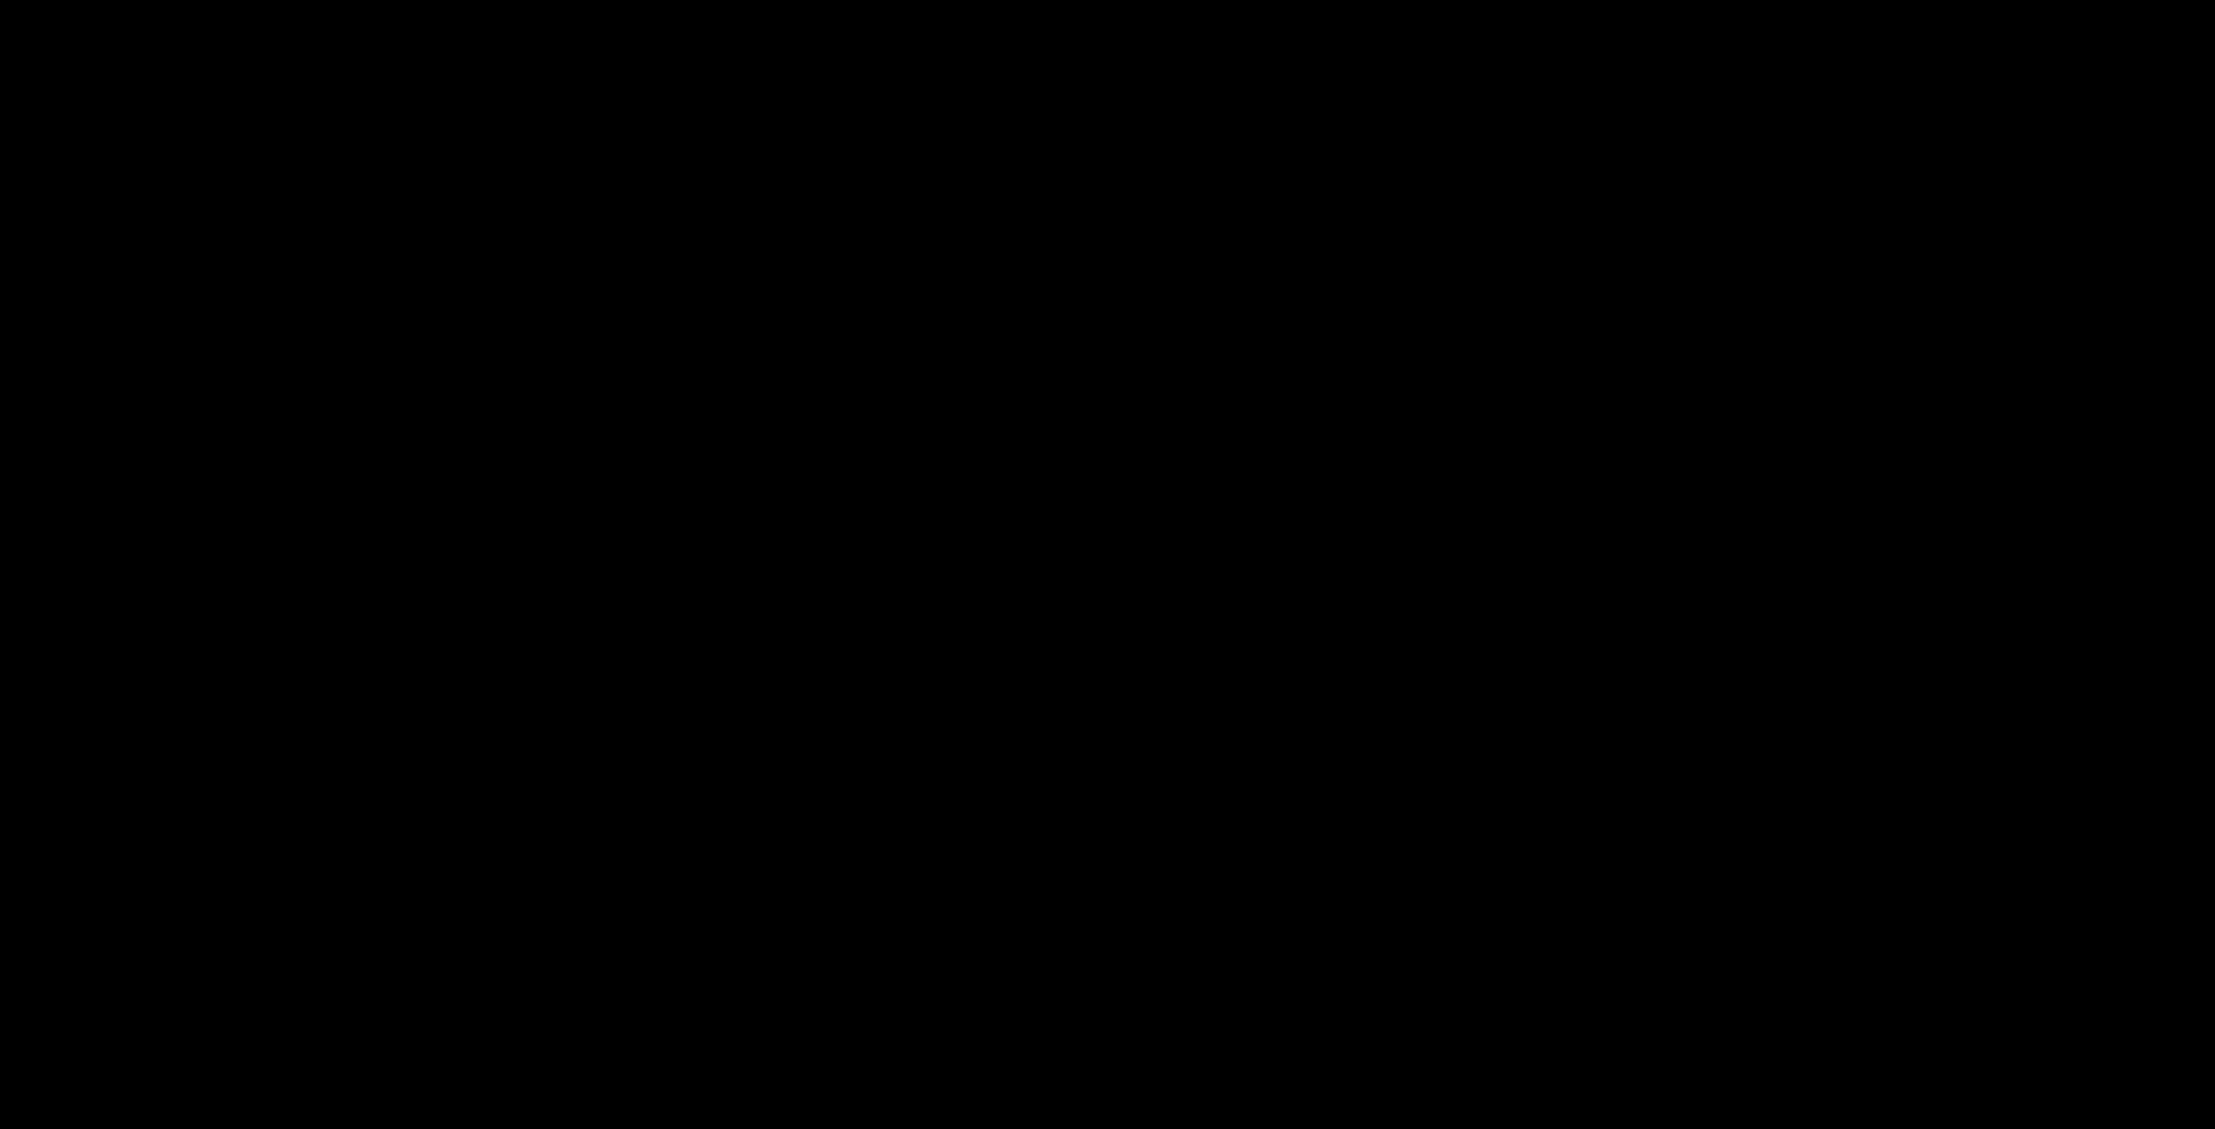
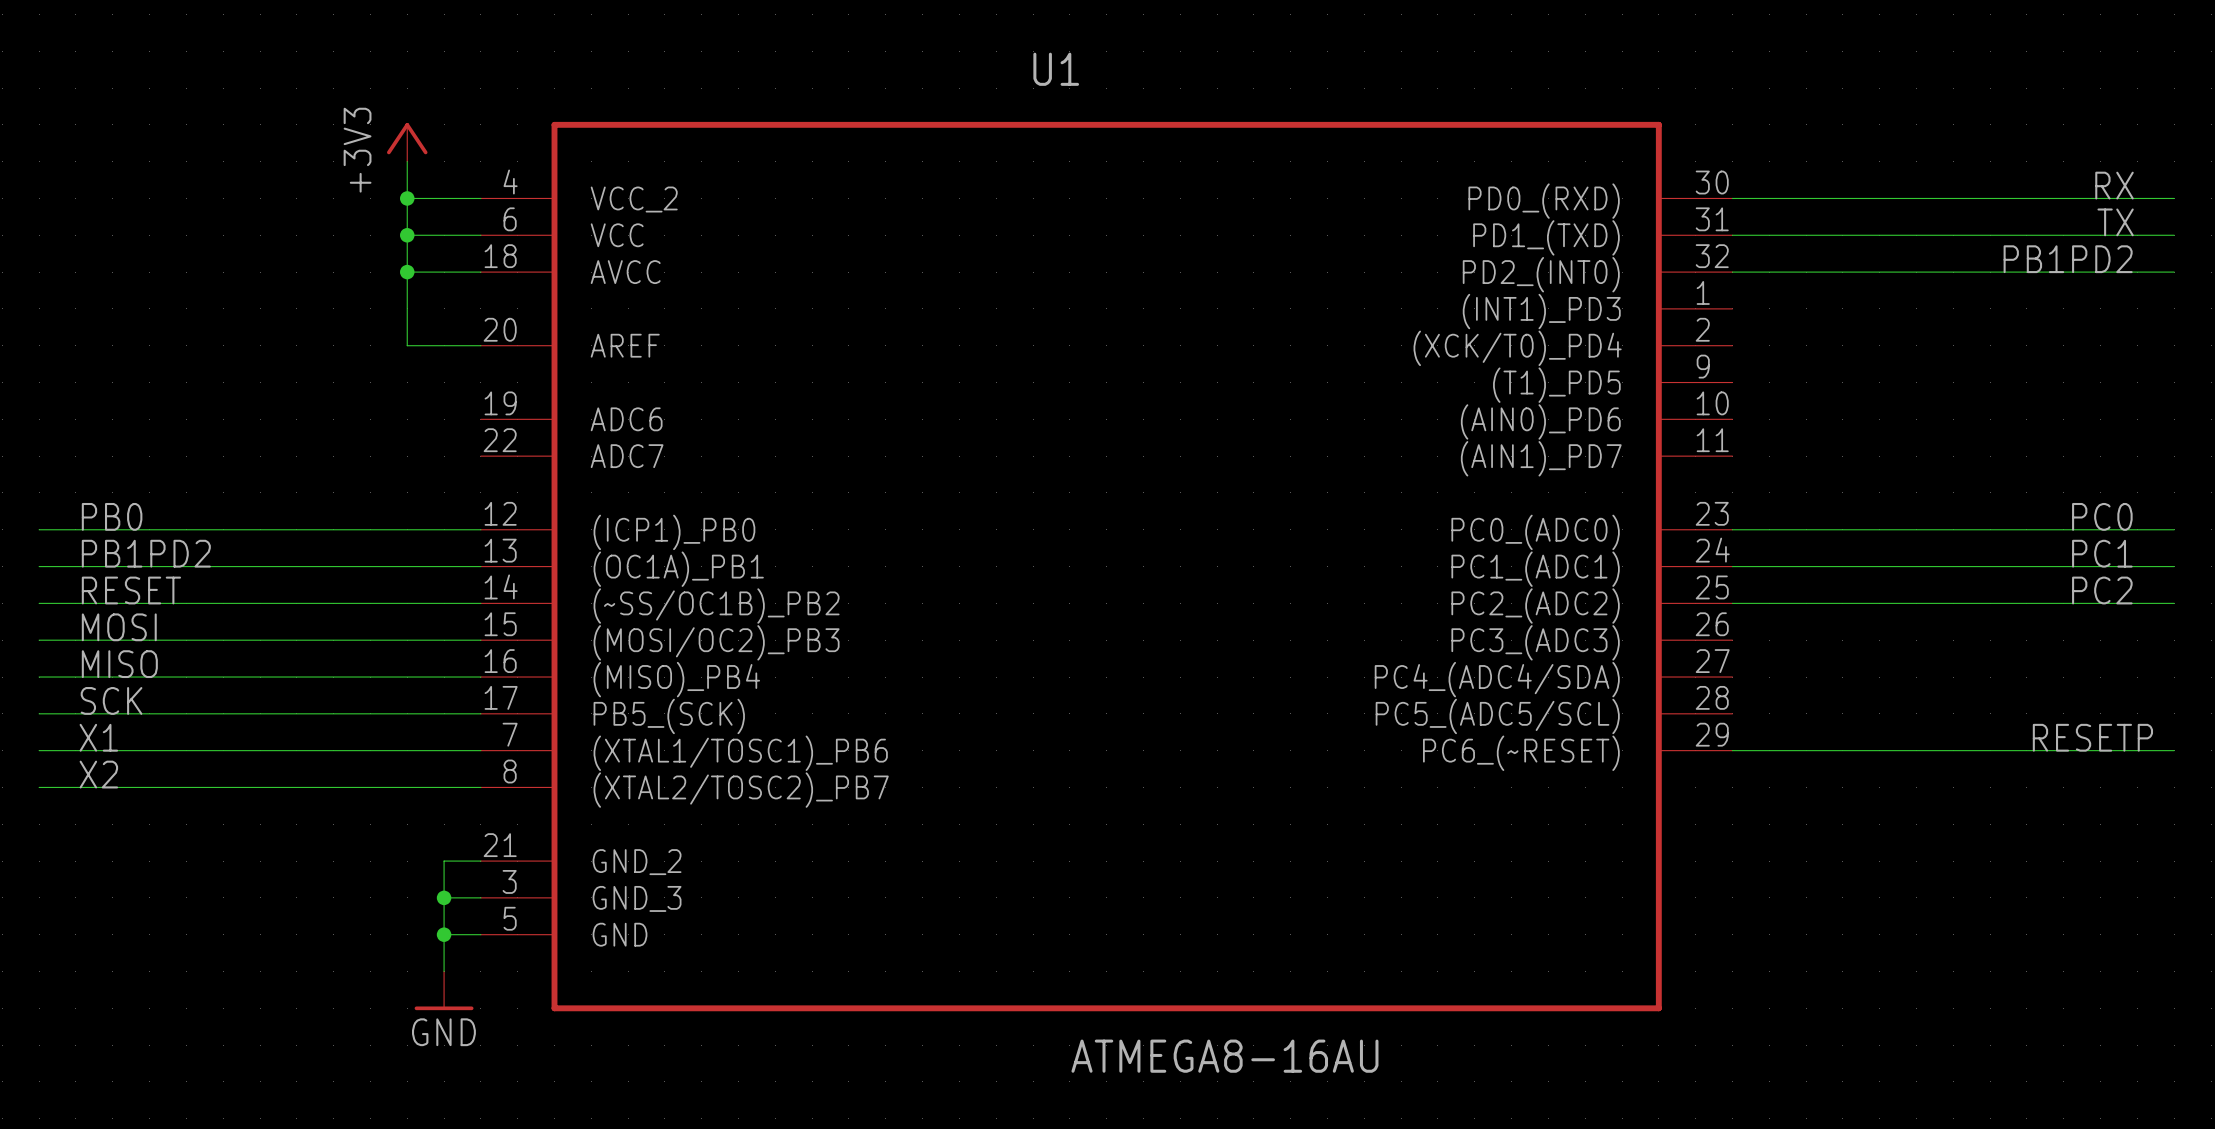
power symbol: none -> +3V3 (407, 142)
wire: none -> (407, 161) (407, 345) (480, 345)
label: none -> RX (2114, 185)
wire: none -> (407, 198) (480, 198)
junction: none -> (407, 198)
wire: none -> (1732, 198) (2174, 198)
label: none -> TX (2115, 222)
wire: none -> (407, 235) (480, 235)
junction: none -> (407, 235)
wire: none -> (1732, 235) (2174, 235)
label: none -> PB1PD2 (2068, 259)
wire: none -> (407, 272) (480, 272)
junction: none -> (407, 272)
wire: none -> (1732, 272) (2174, 272)
label: none -> PB0 (112, 516)
label: none -> PC0 (2102, 516)
wire: none -> (39, 529) (480, 529)
wire: none -> (1732, 529) (2174, 529)
label: none -> PB1PD2 (146, 553)
label: none -> PC1 (2102, 553)
wire: none -> (39, 566) (480, 566)
U1: none -> ATMEGA8-16AU (1106, 566)
wire: none -> (1732, 566) (2174, 566)
label: none -> RESET (131, 590)
label: none -> PC2 (2102, 590)
wire: none -> (39, 603) (480, 603)
wire: none -> (1732, 603) (2174, 603)
label: none -> MOSI (119, 627)
wire: none -> (39, 640) (480, 640)
label: none -> MISO (119, 664)
wire: none -> (39, 677) (480, 677)
label: none -> SCK (111, 700)
wire: none -> (39, 713) (480, 713)
label: none -> X1 (98, 737)
label: none -> RESETP (2092, 737)
wire: none -> (39, 750) (480, 750)
wire: none -> (1732, 750) (2174, 750)
label: none -> X2 (98, 774)
wire: none -> (39, 787) (480, 787)
wire: none -> (480, 861) (444, 861) (444, 971)
wire: none -> (444, 897) (480, 897)
junction: none -> (444, 897)
wire: none -> (444, 934) (480, 934)
junction: none -> (444, 934)
power symbol: none -> GND (444, 990)

